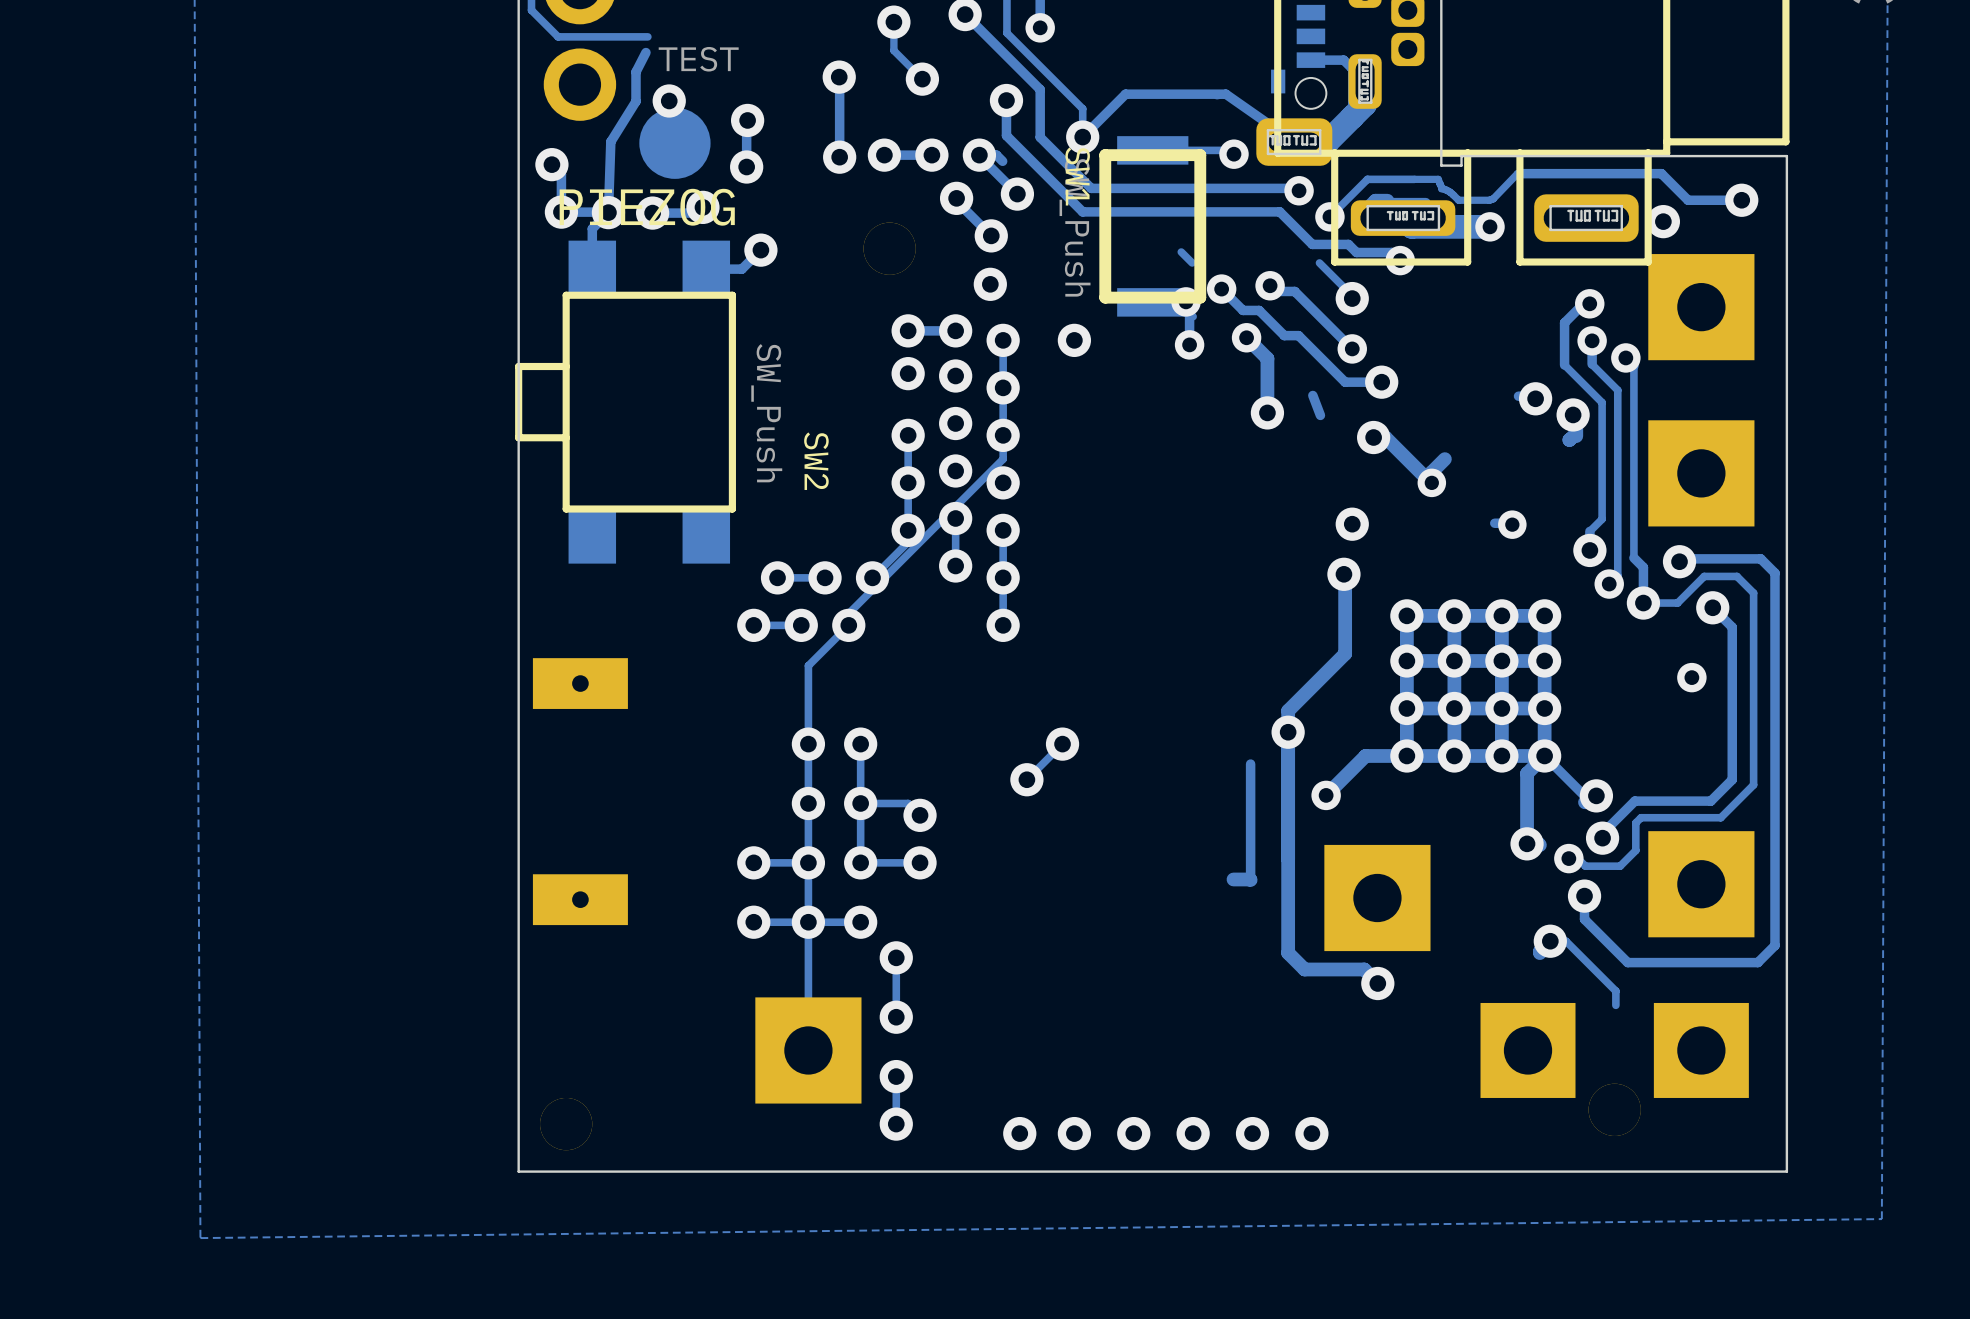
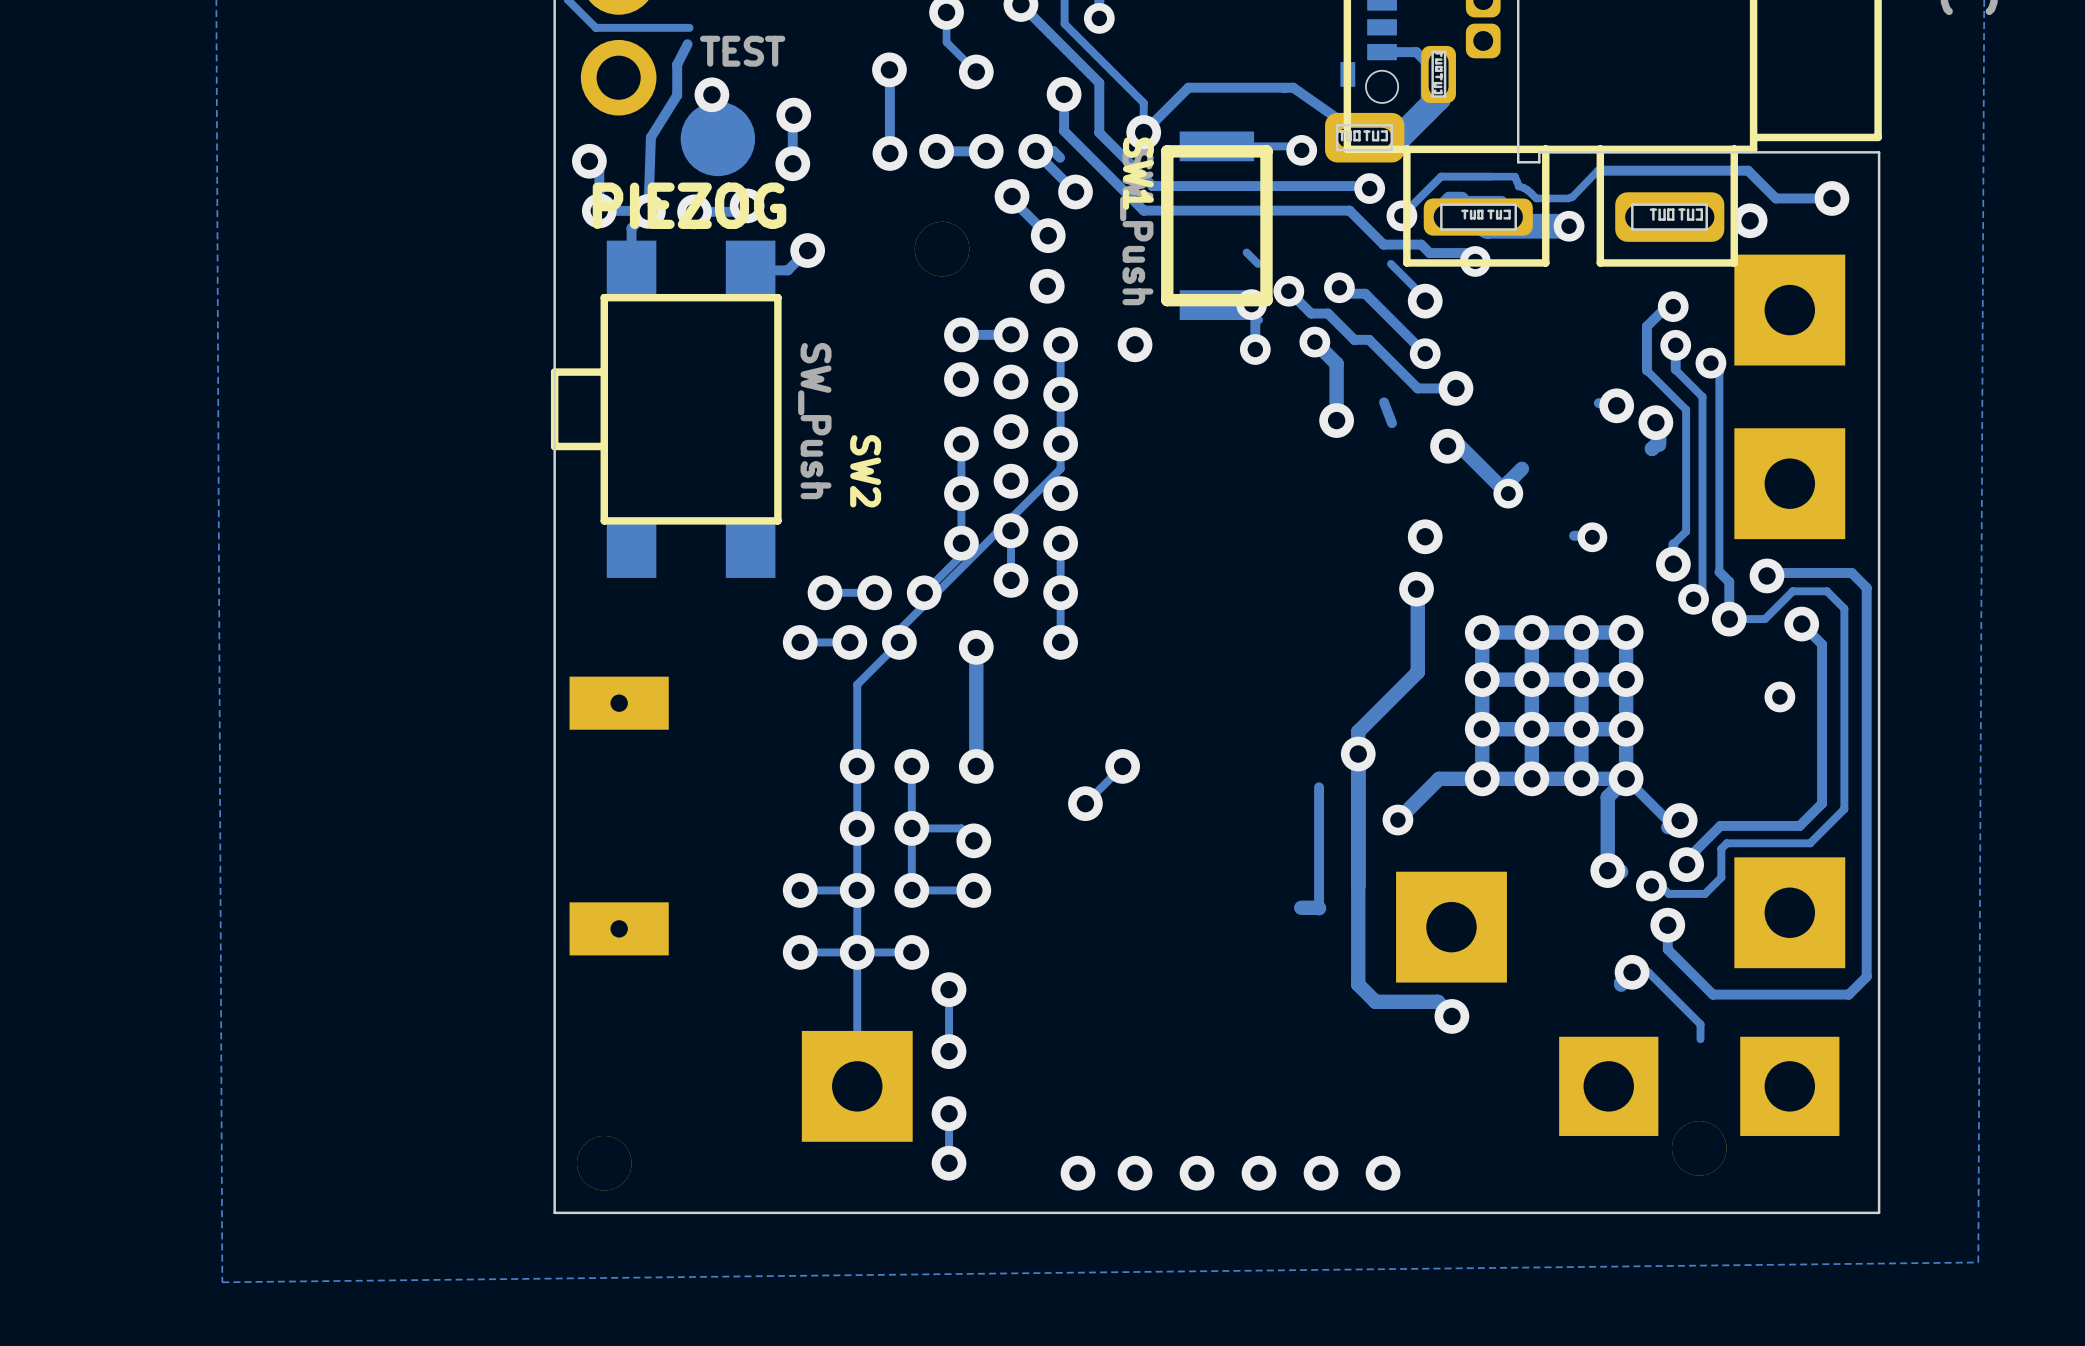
track: none -> (976, 647) (976, 766)
via: none -> (976, 647)
via: none -> (976, 766)

